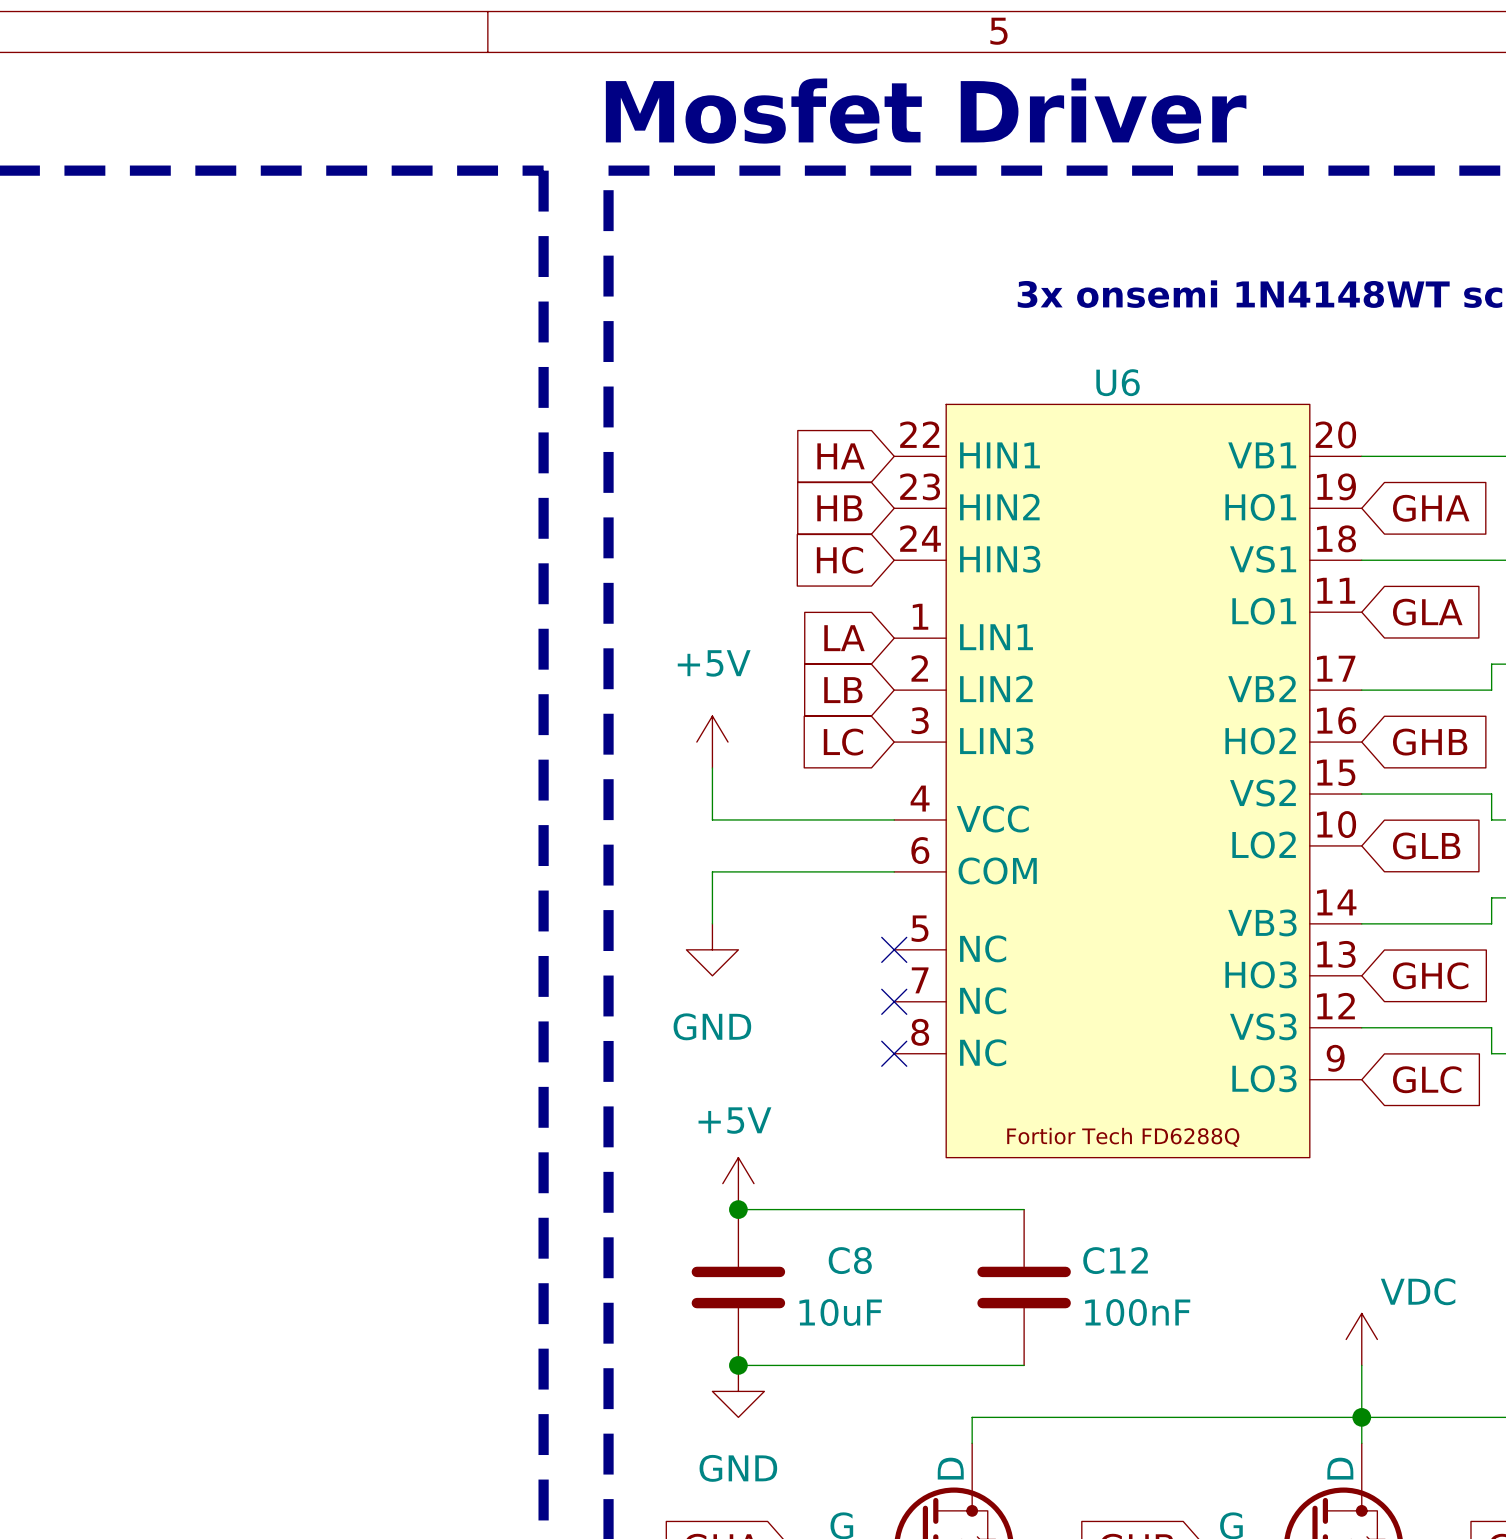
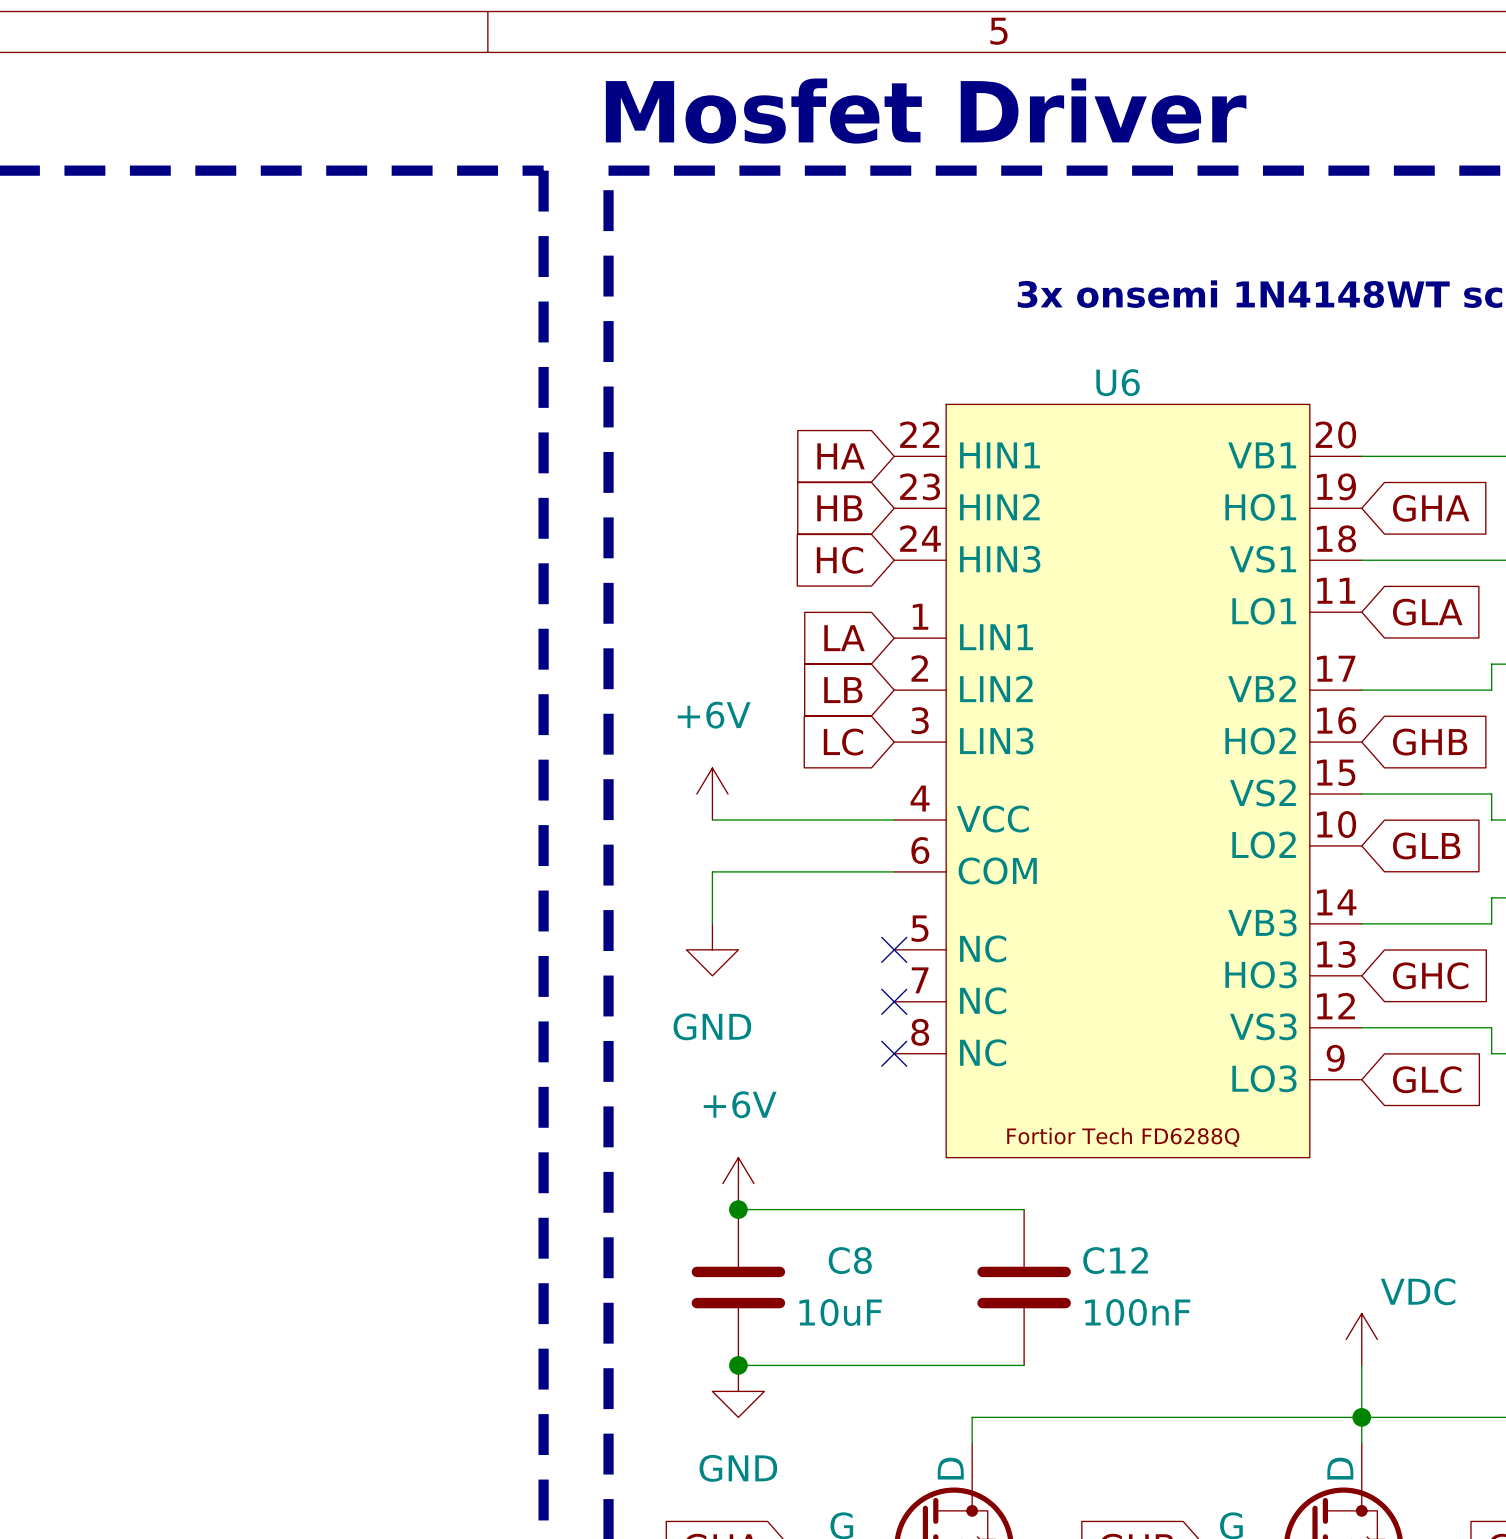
power symbol: +5V (712, 742) -> none
power symbol: none -> +6V (712, 794)
power symbol: +5V (738, 1183) -> +6V (738, 1183)

